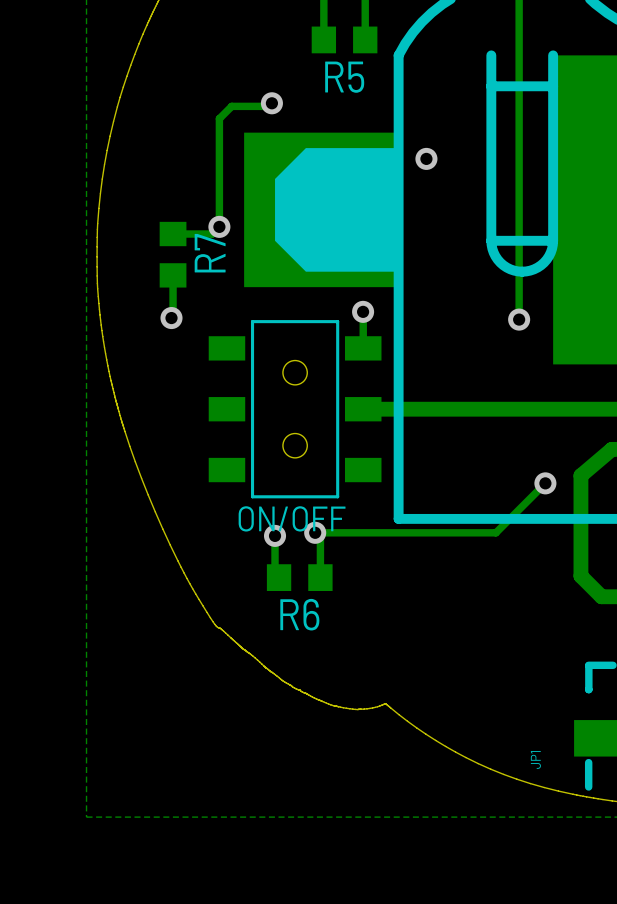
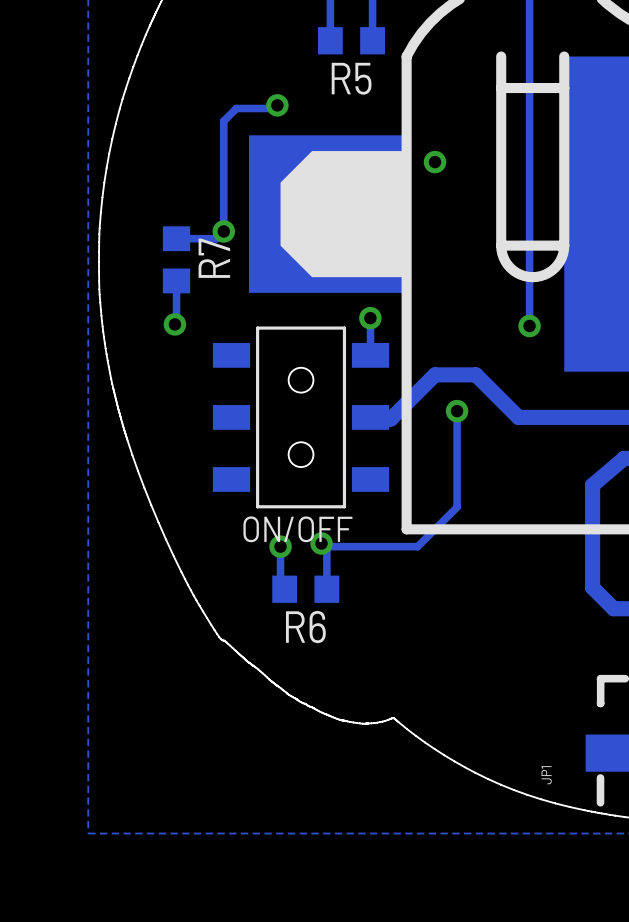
track: none -> (457, 411) (457, 507) (417, 546) (324, 546)
via: none -> (457, 411)
track: (508, 409) (363, 409) -> (518, 417) (475, 374) (435, 374) (390, 419) (370, 417)
track: (545, 483) (495, 532) (315, 532) -> none
via: (545, 483) -> none

